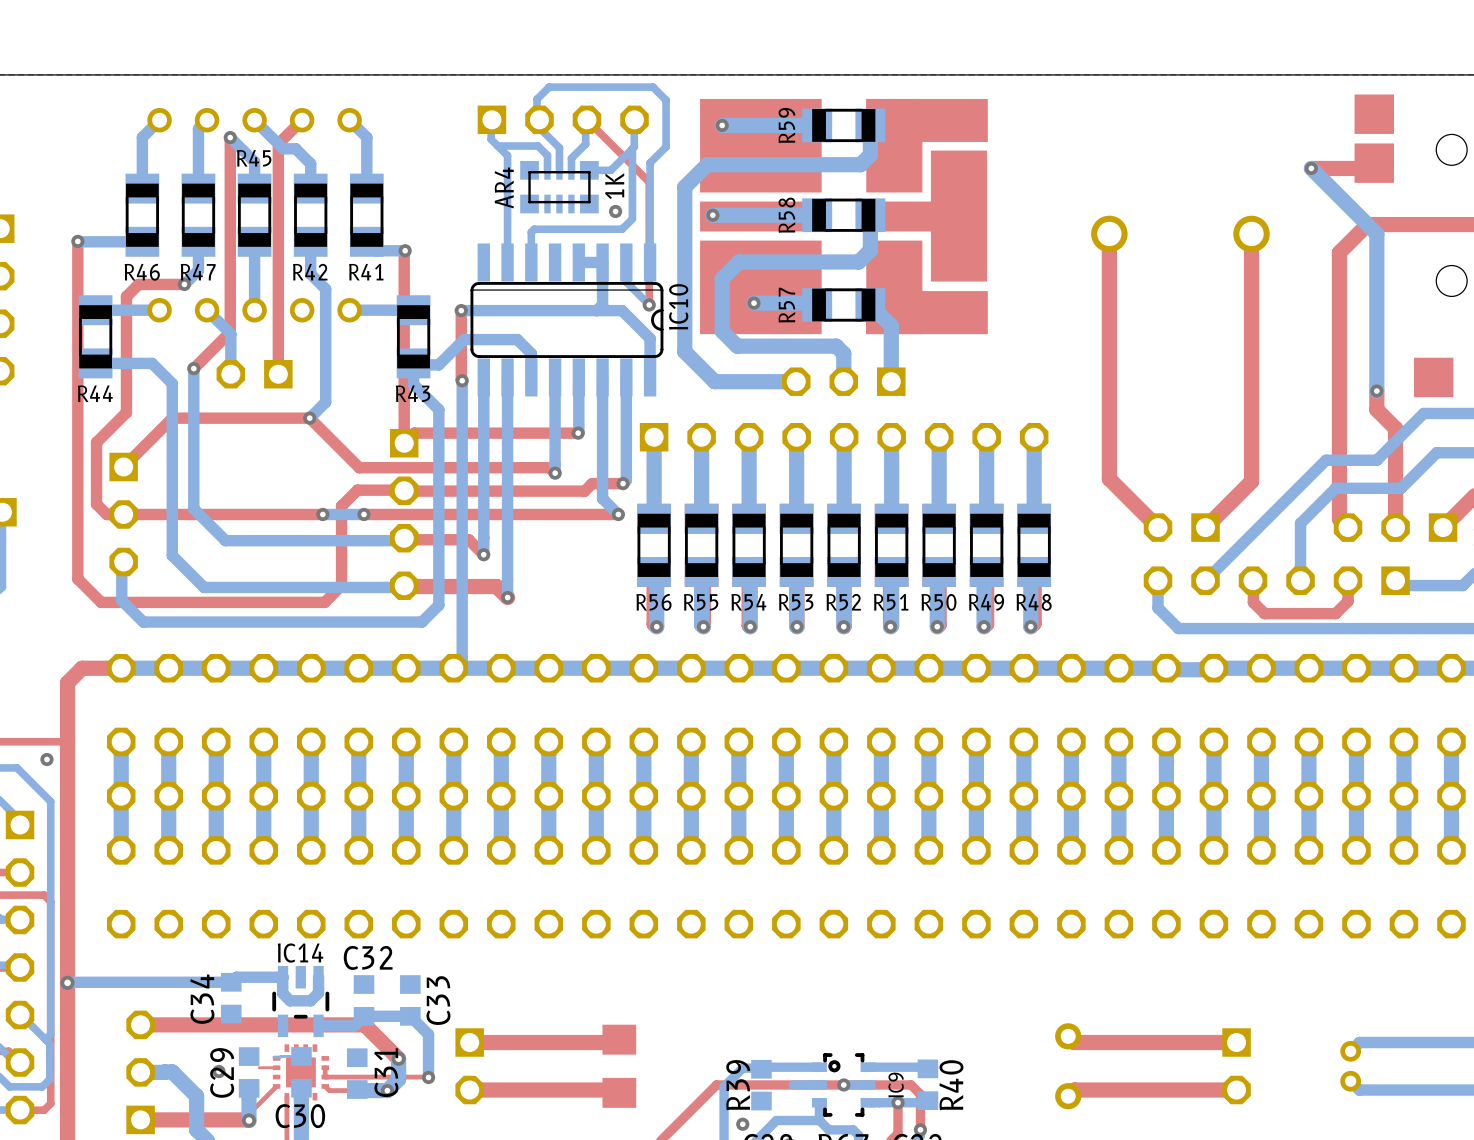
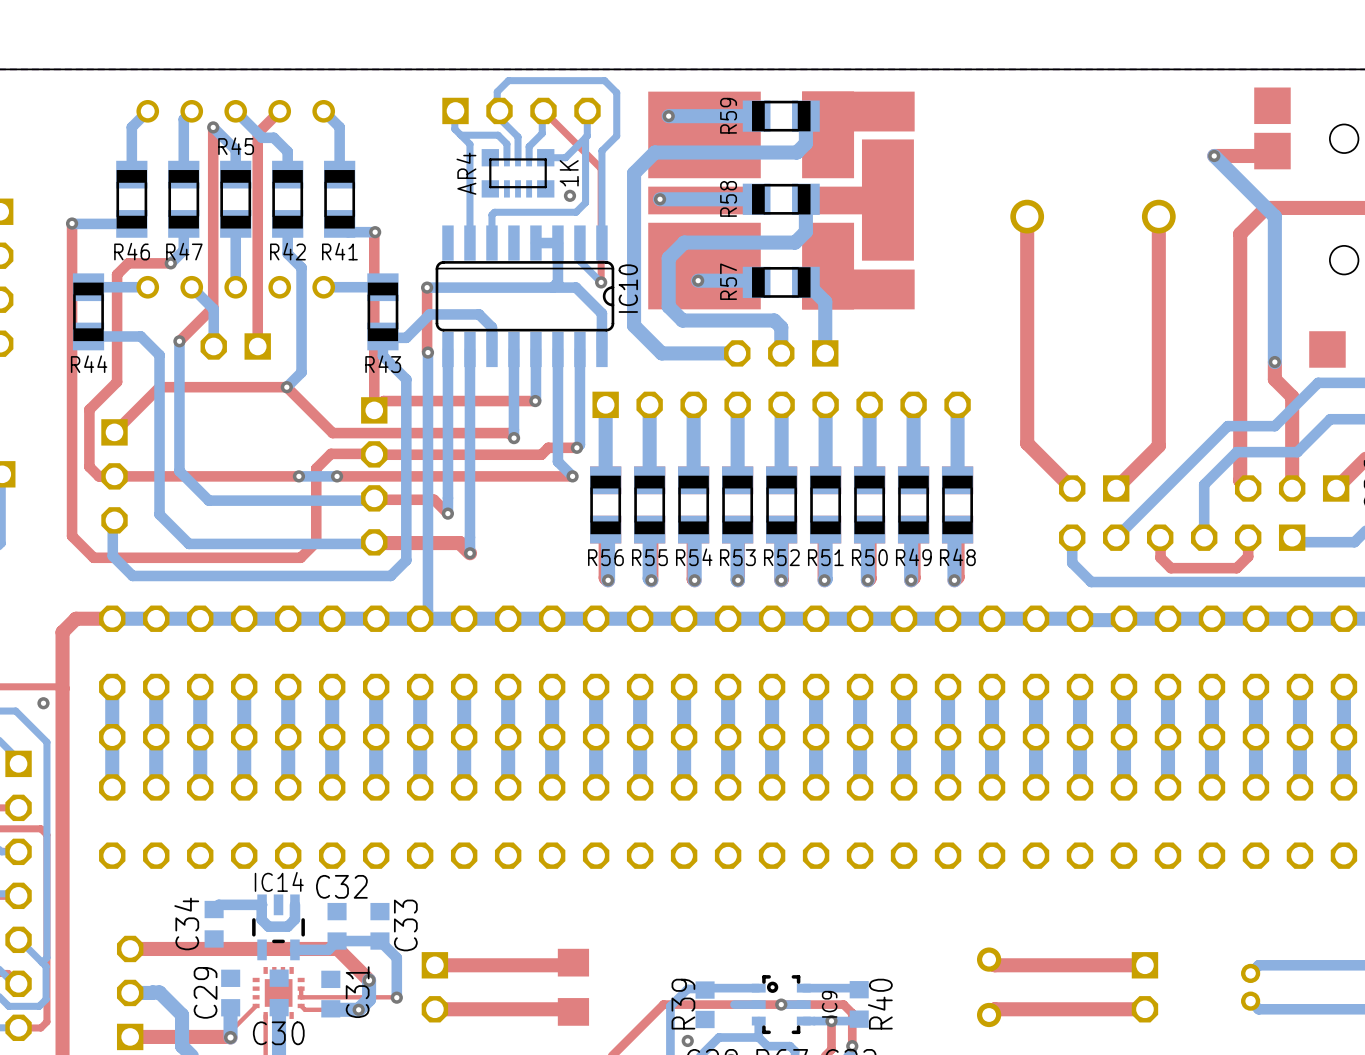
via: (67, 982) -> none
bottom track: (231, 982) (67, 982) -> none
bottom track: (301, 1056) (274, 1057) -> none
top track: (276, 1067) (259, 1067) -> none
via: (218, 1071) -> none

